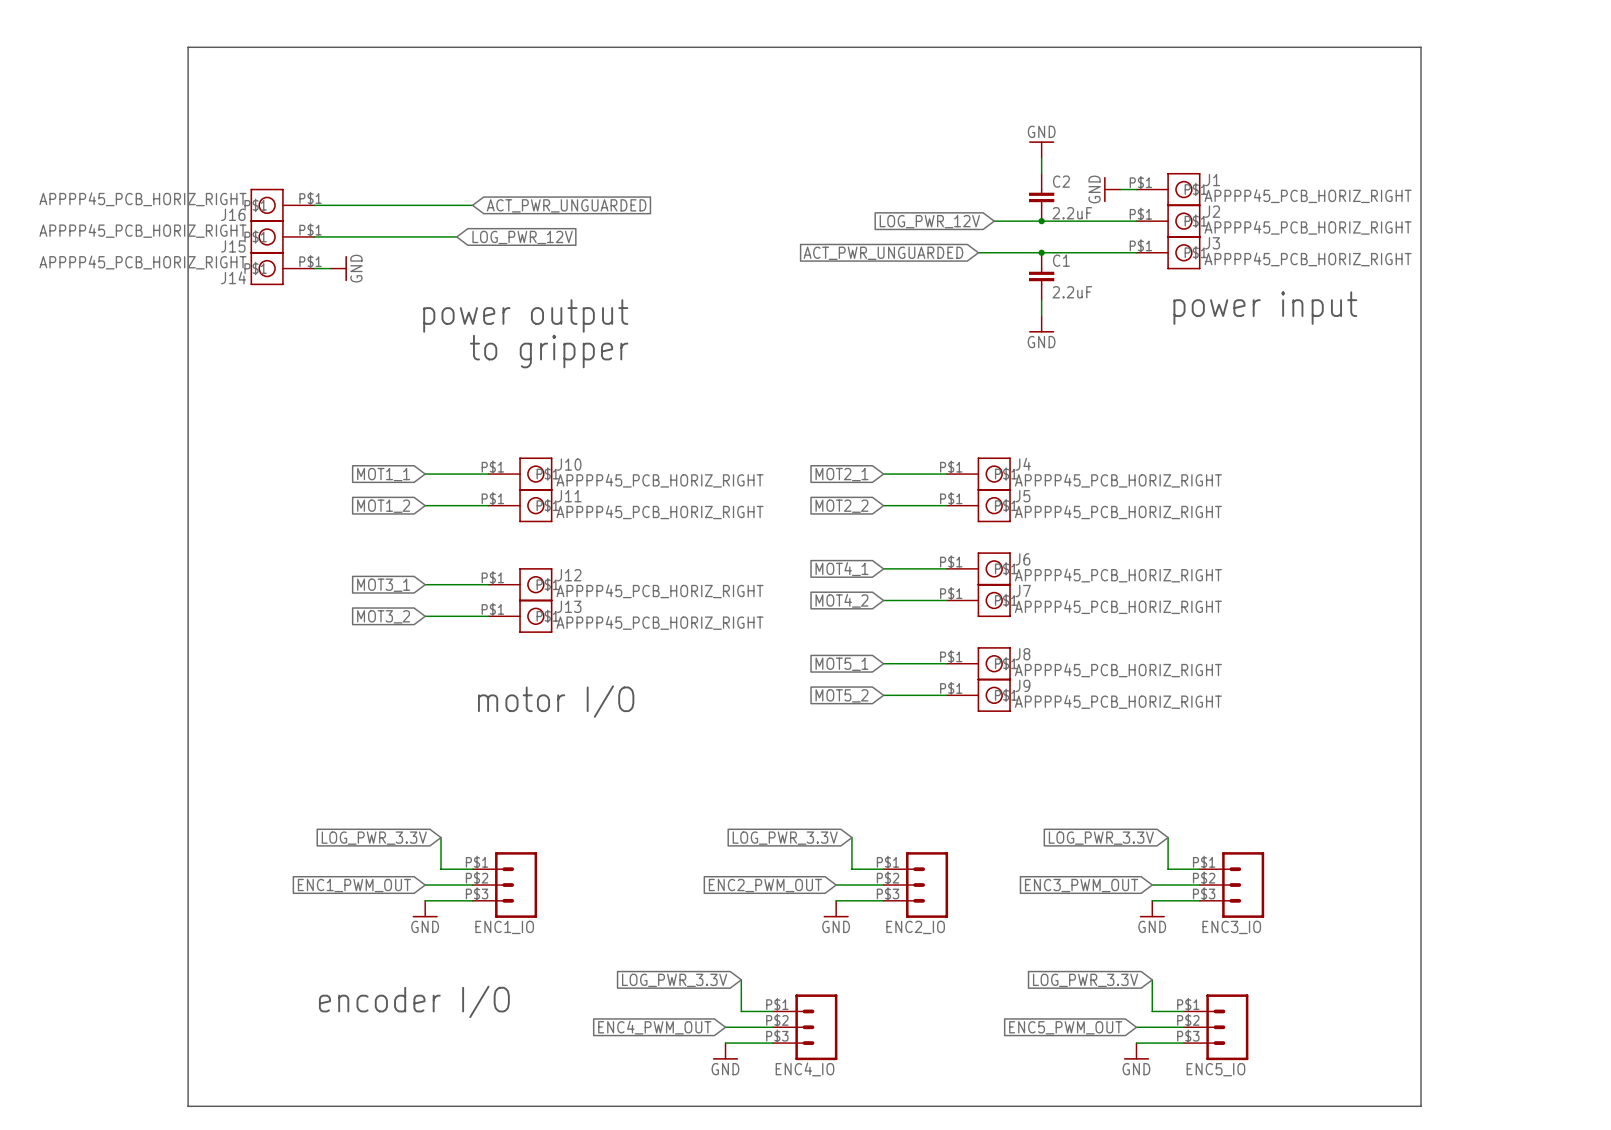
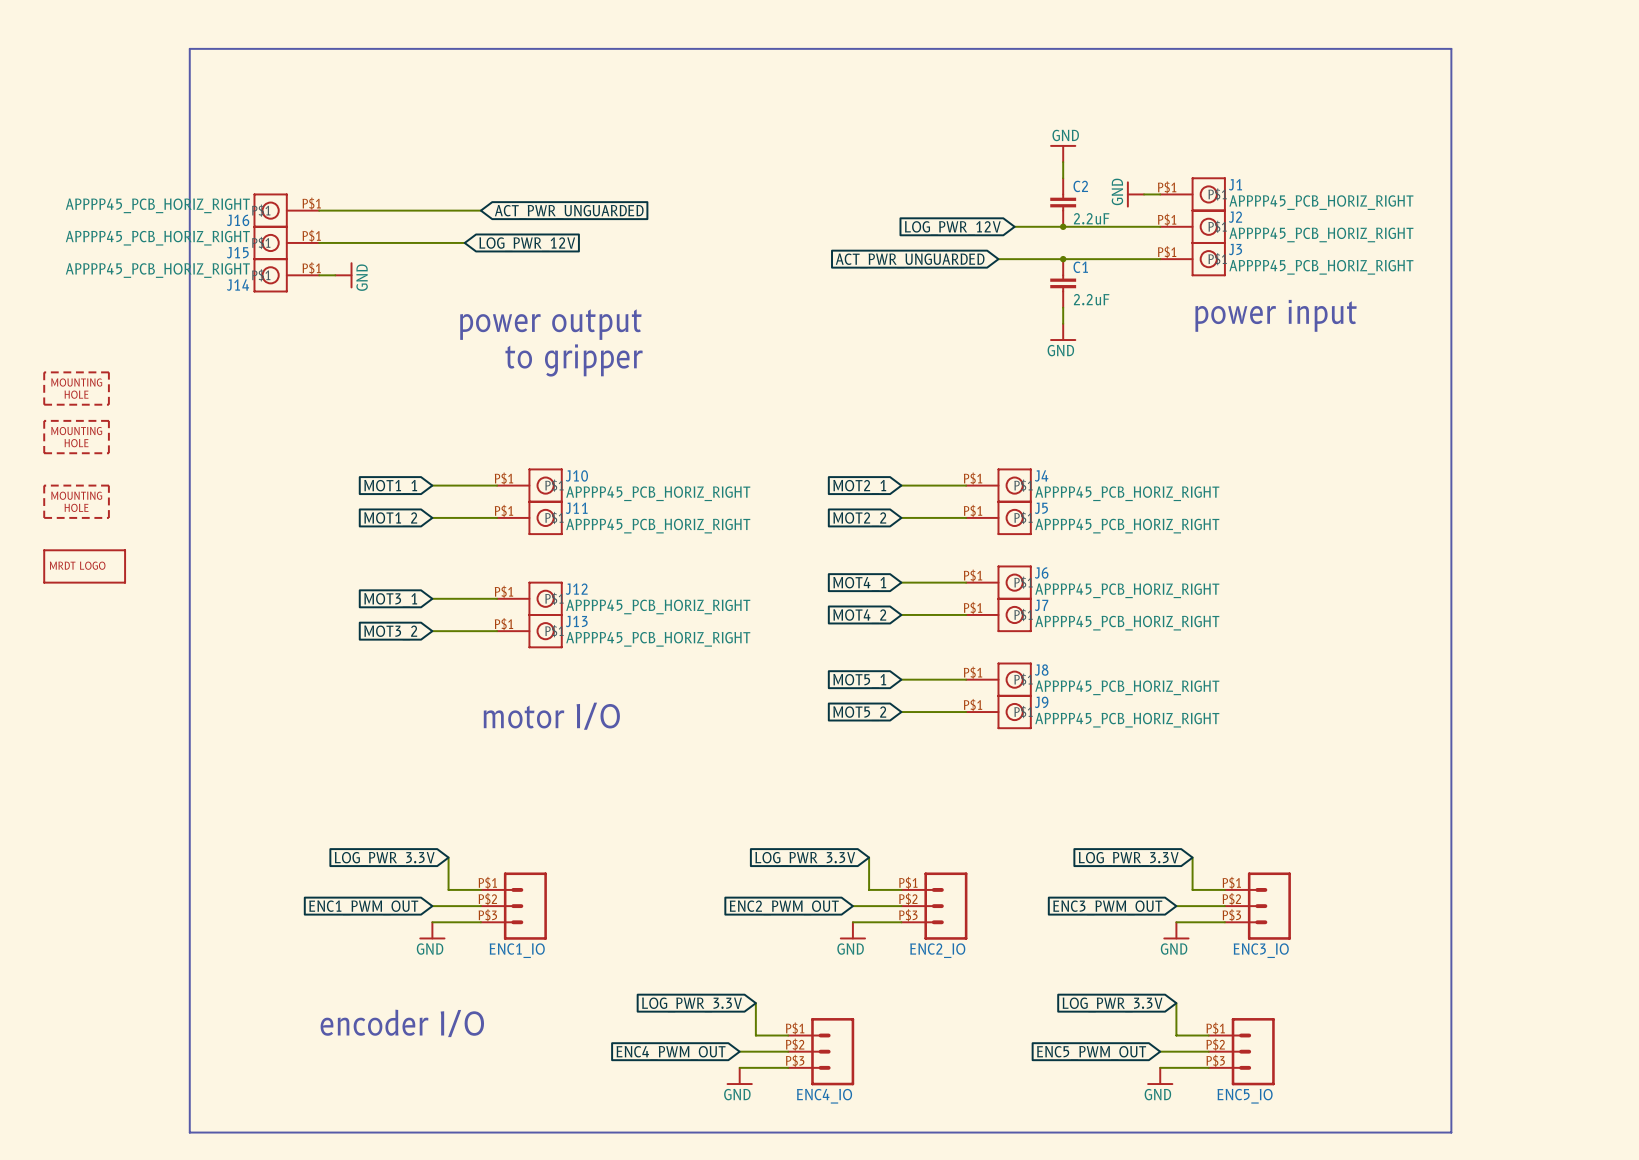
part: none -> (76, 388)
part: none -> (76, 437)
part: none -> (76, 501)
part: none -> (84, 566)

